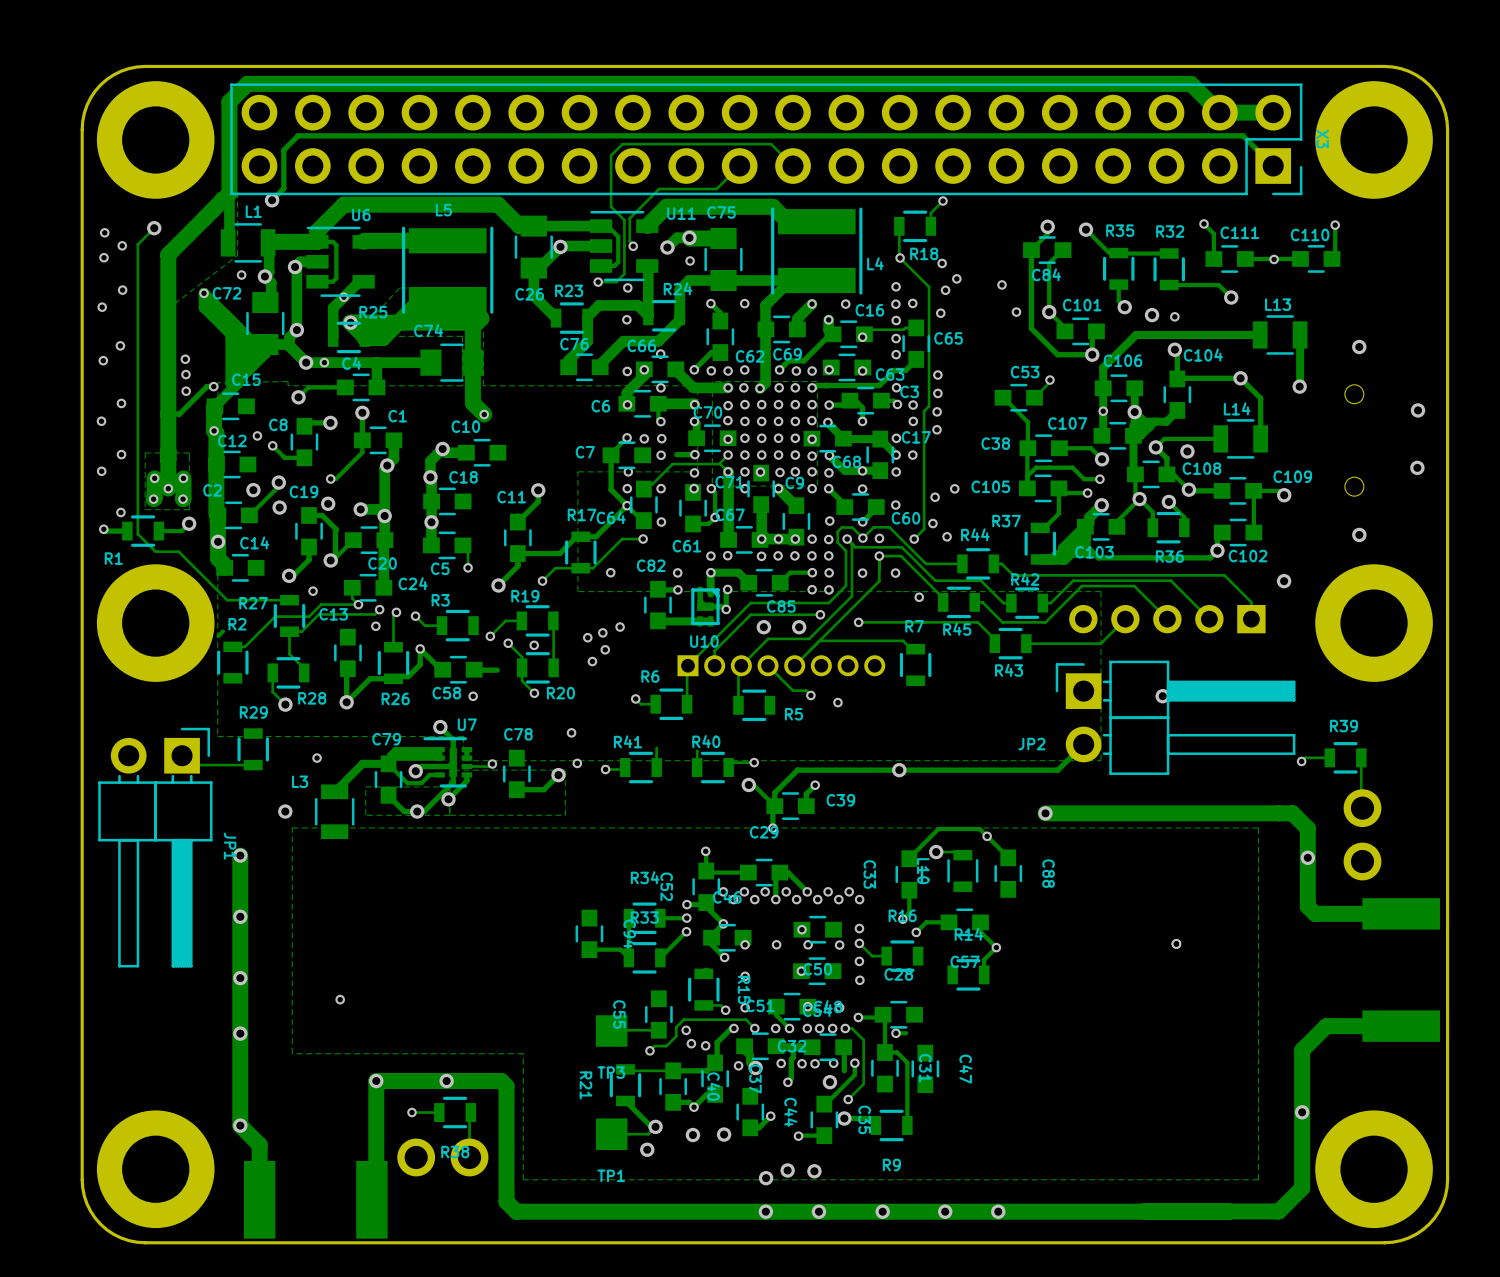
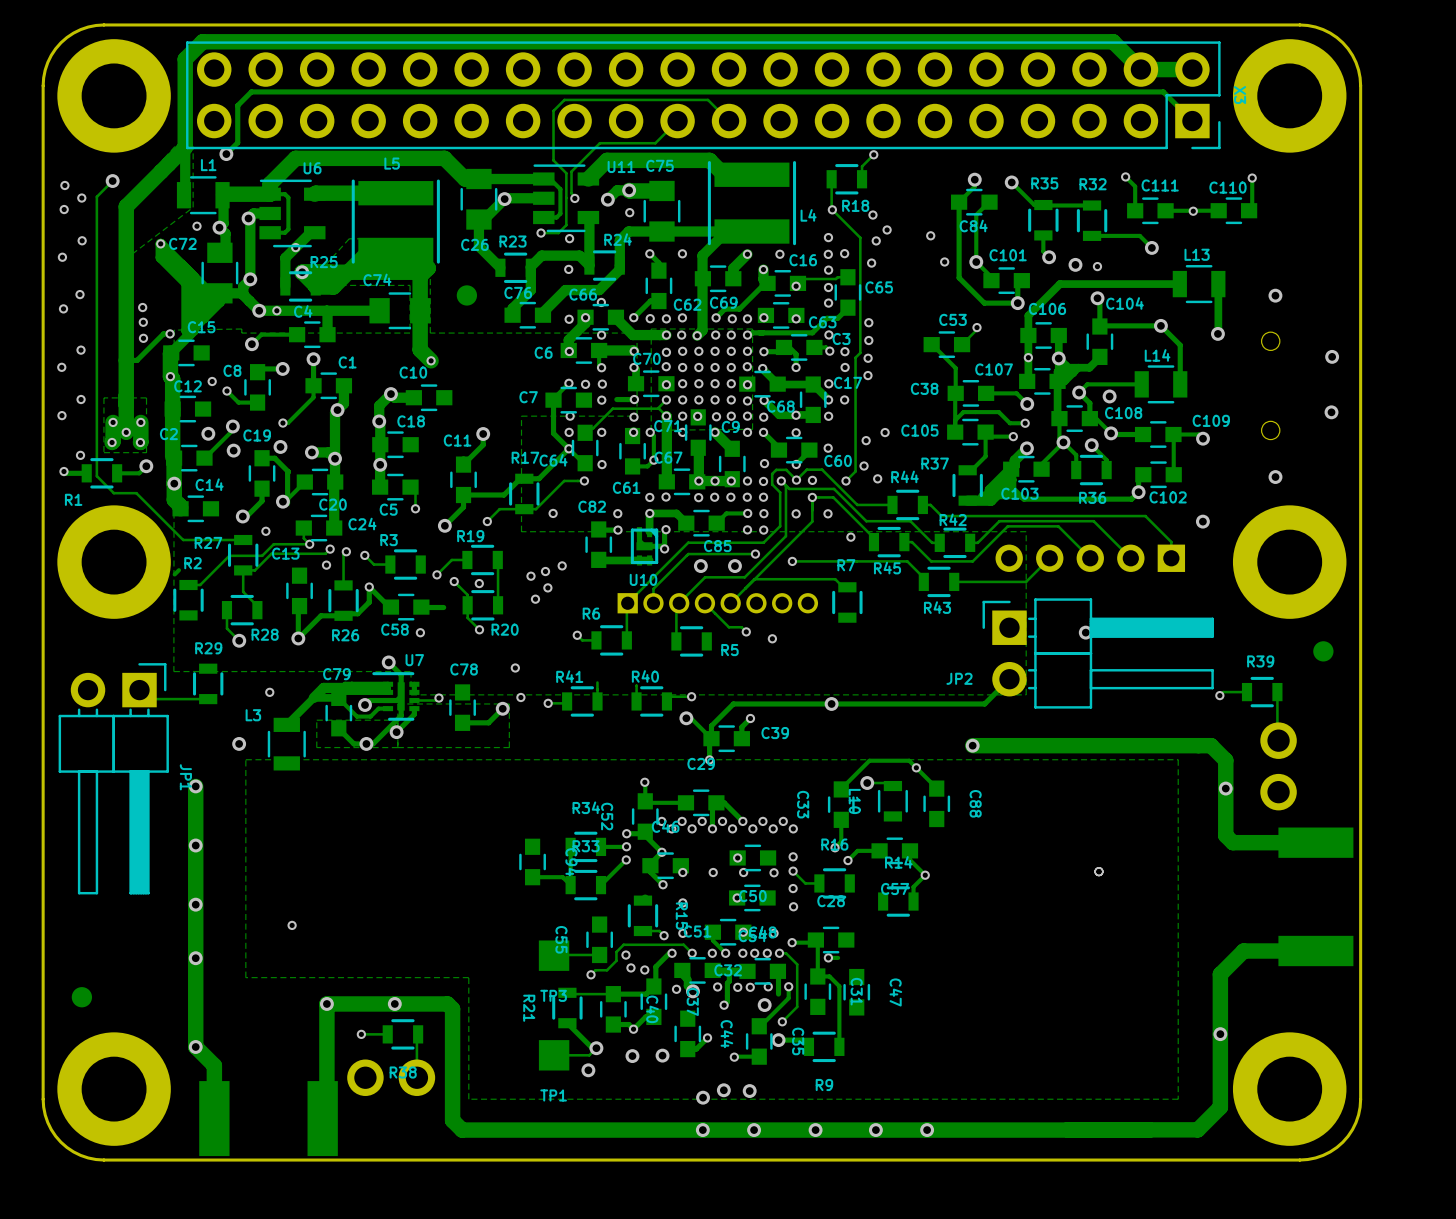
part: none -> (466, 295)
part: none -> (1323, 651)
track: none -> (348, 687) (323, 687) (313, 697)
part: none -> (81, 997)

